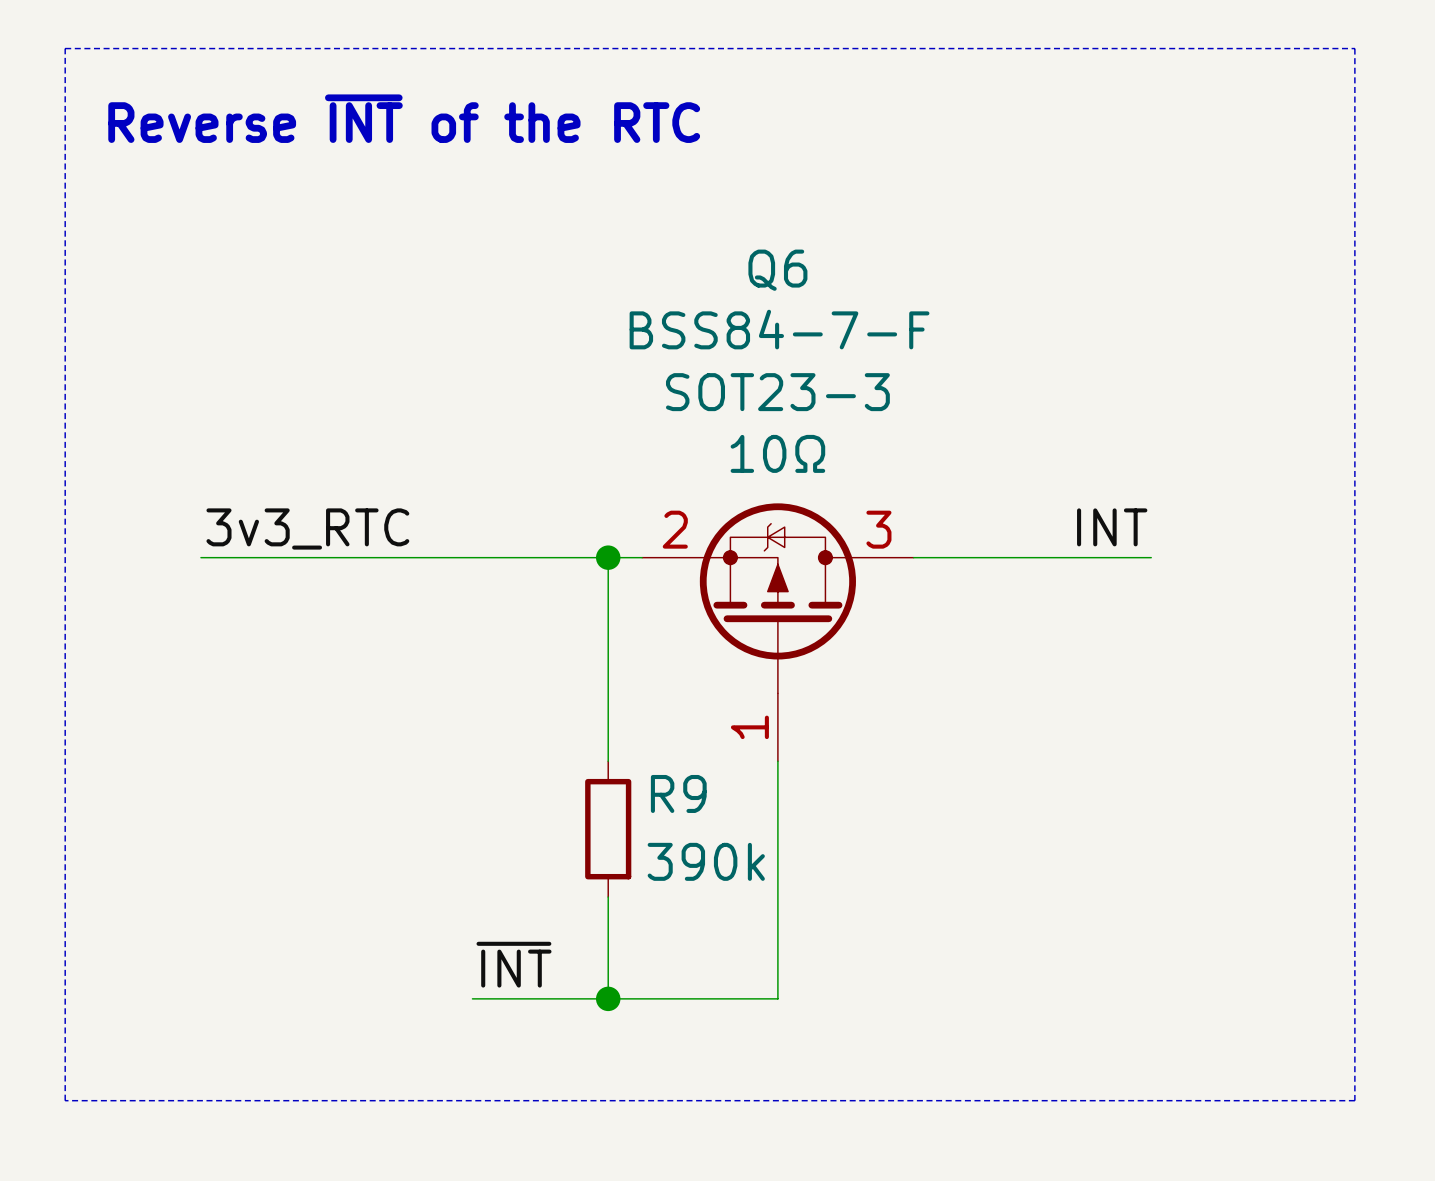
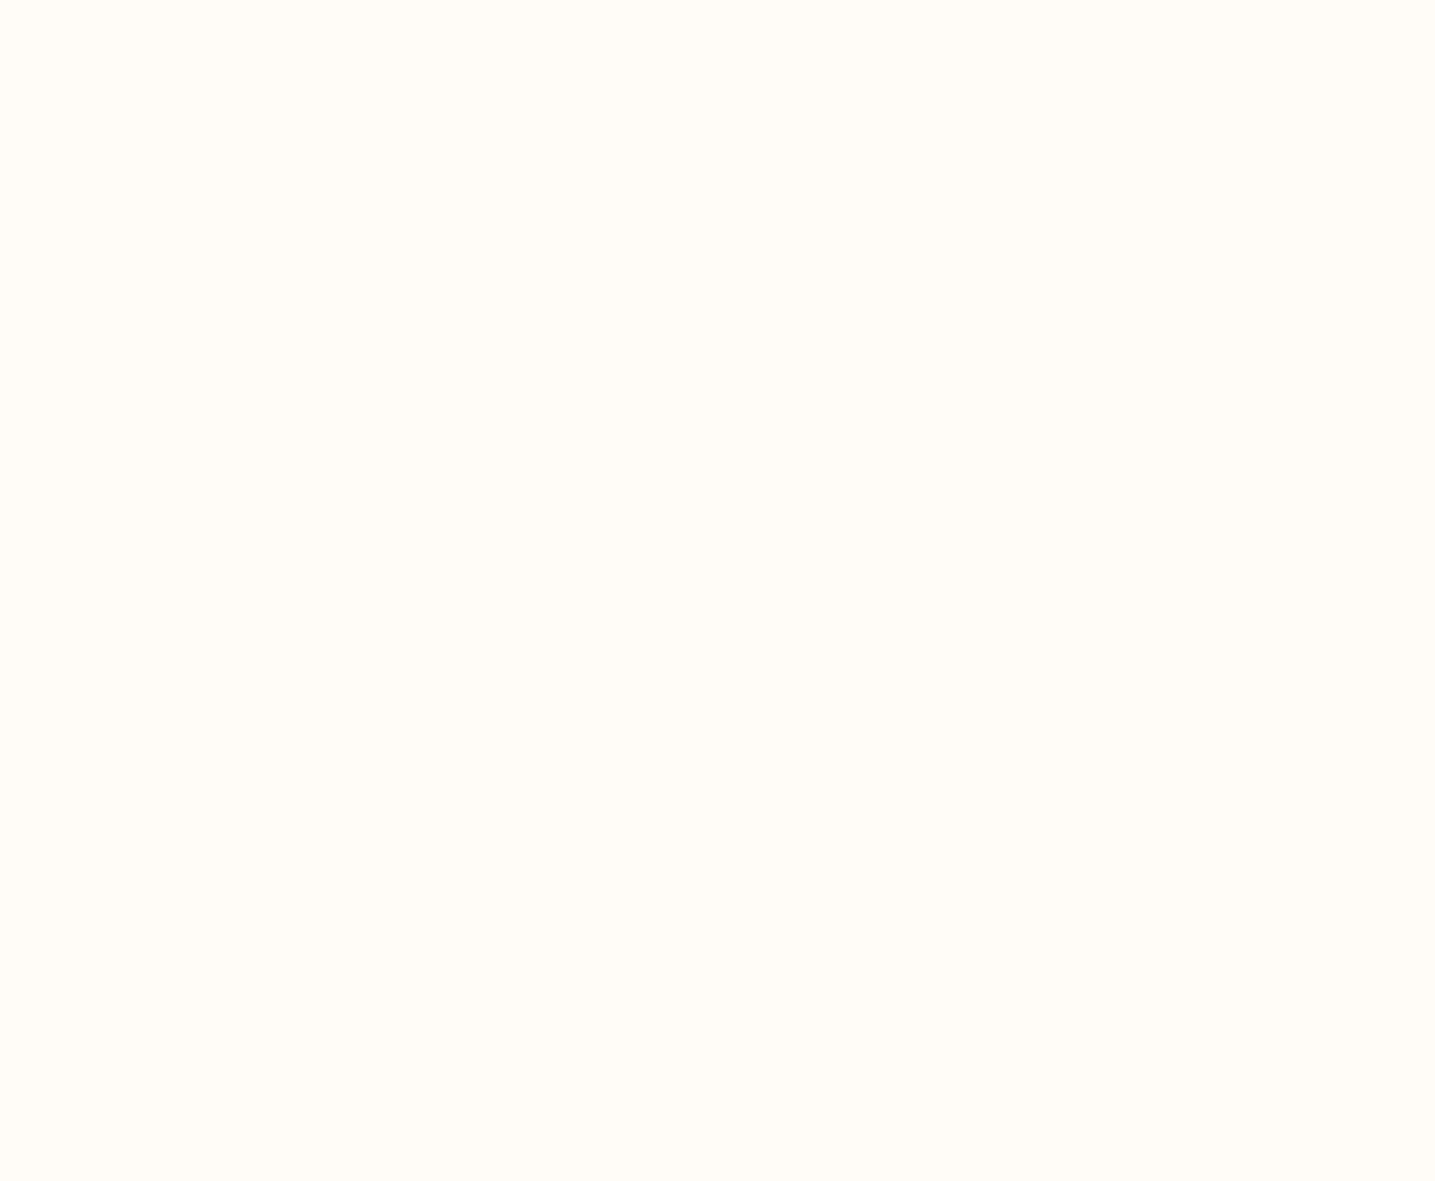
line: (65, 48) (1354, 48) (1354, 1100) (65, 1100) (65, 48) -> none
text: Reverse ~{INT} of the RTC (404, 118) -> none
label: INT (1112, 527) -> none
label: 3v3_RTC (307, 528) -> none
wire: (200, 557) (642, 557) -> none
wire: (608, 557) (608, 761) -> none
junction: (608, 557) -> none
wire: (913, 557) (1151, 557) -> none
Q6: BSS84-7-F (777, 632) -> none
wire: (777, 761) (777, 998) (472, 998) -> none
R9: 390k (608, 829) -> none
wire: (608, 897) (608, 998) -> none
label: ~{INT} (514, 964) -> none
junction: (608, 998) -> none

